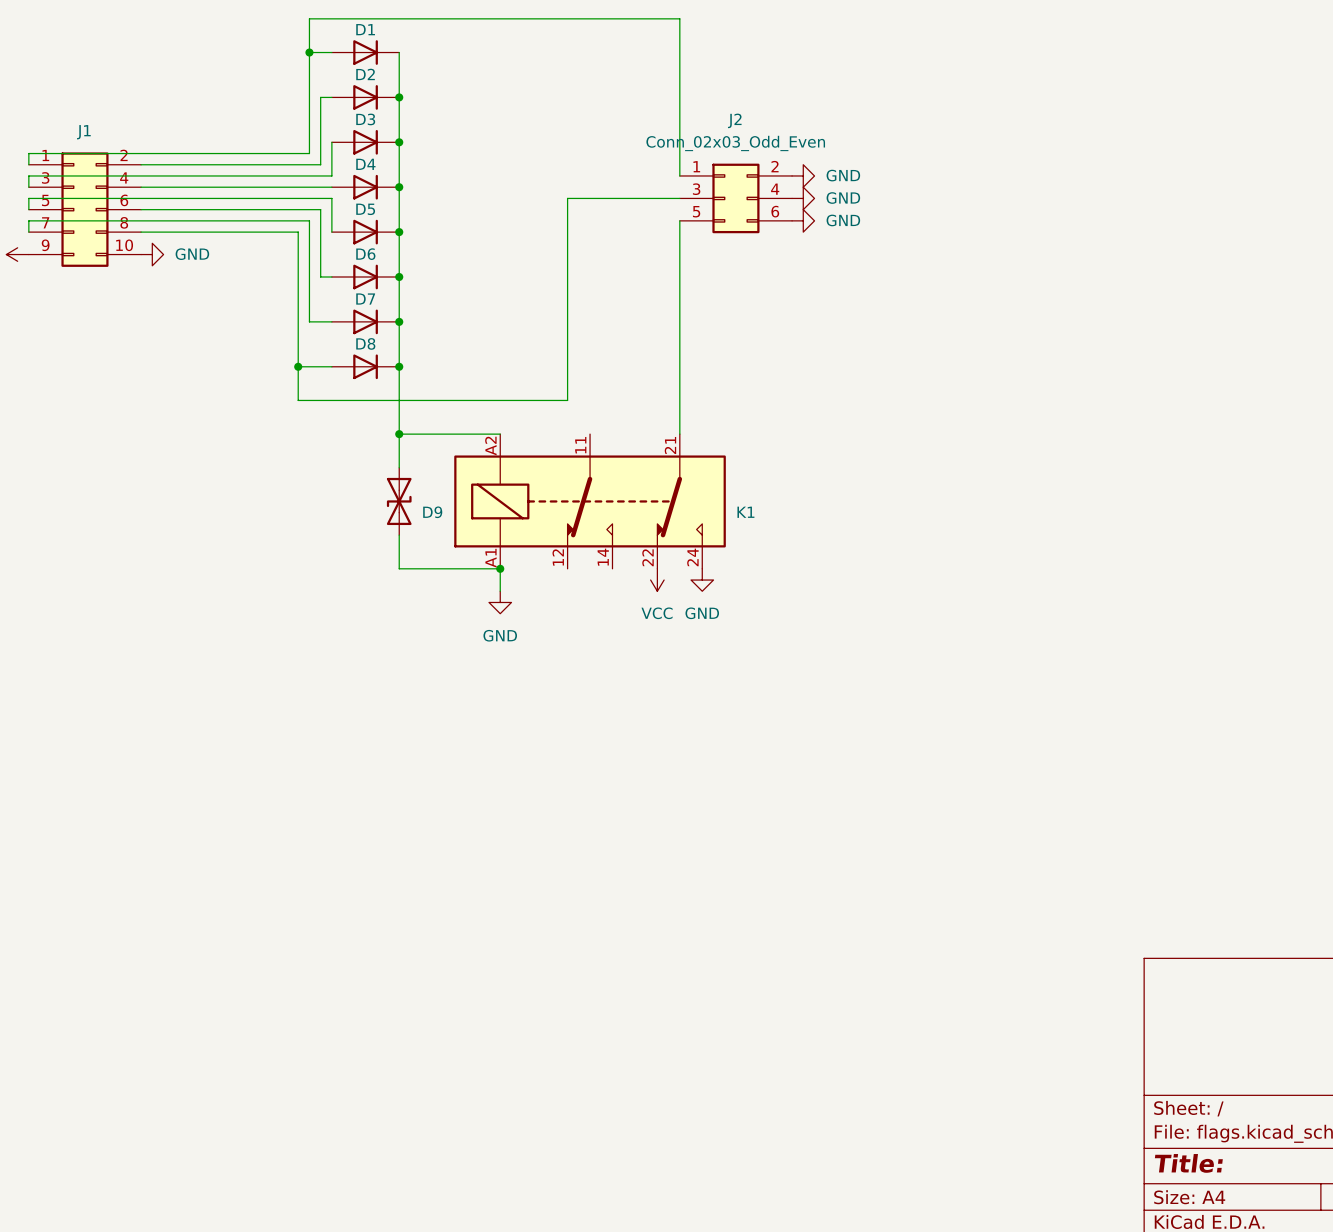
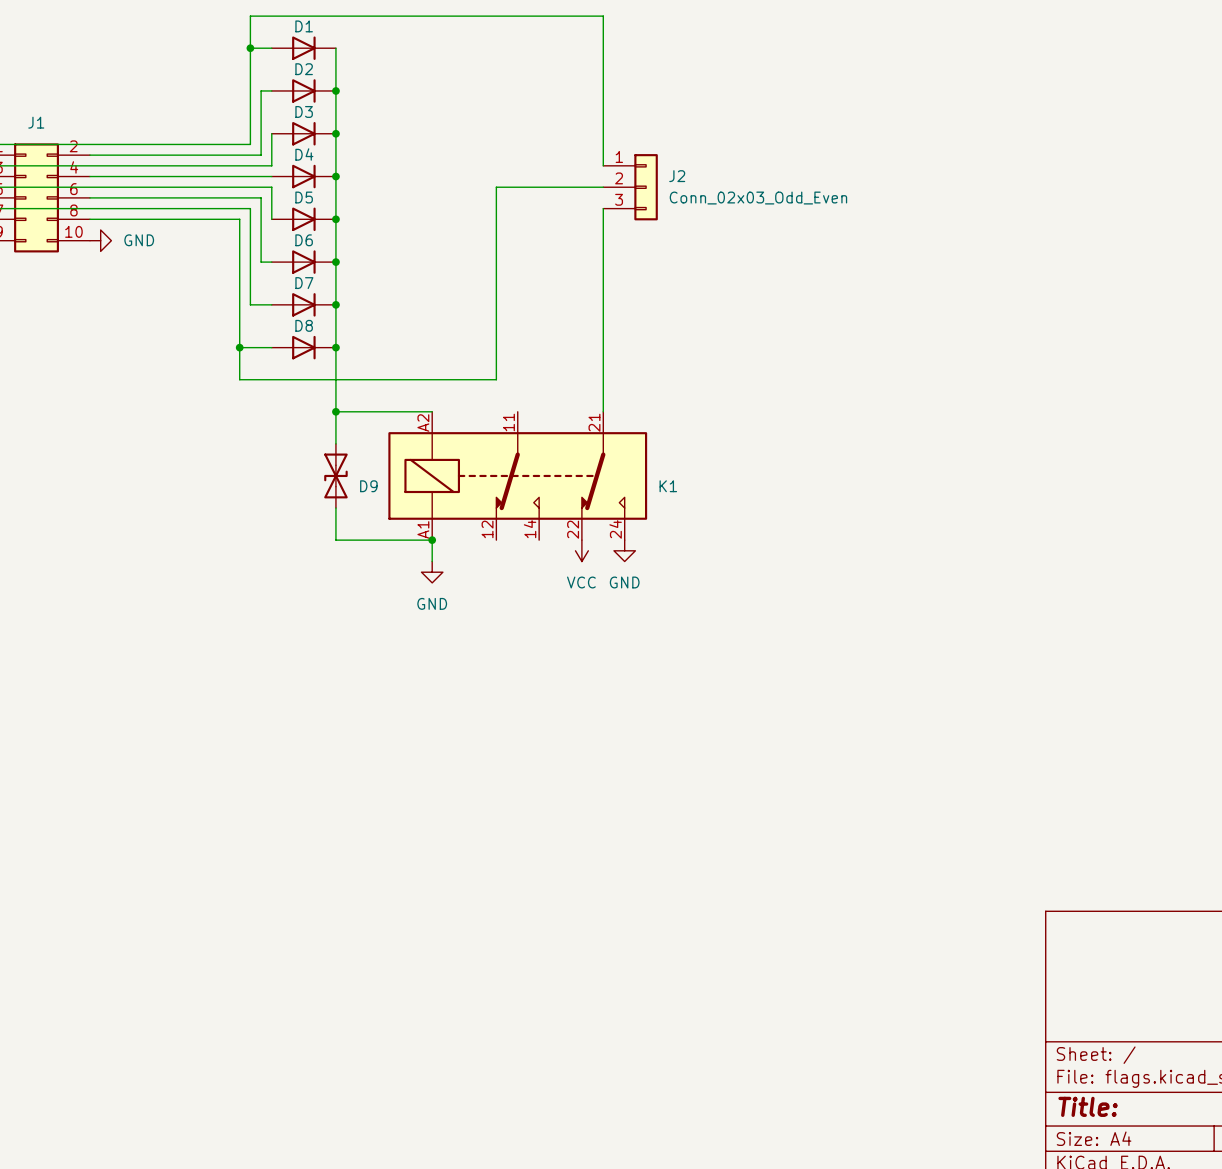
J2 name position: J2 (734, 120) -> J2 (677, 176)
J2 value position: Conn_02x03_Odd_Even (735, 143) -> Conn_02x03_Odd_Even (758, 198)
J2 symbol: [679, 163, 793, 234] -> [603, 154, 658, 221]
power symbol: GND (803, 175) -> none
power symbol: GND (803, 198) -> none
power symbol: GND (803, 220) -> none

